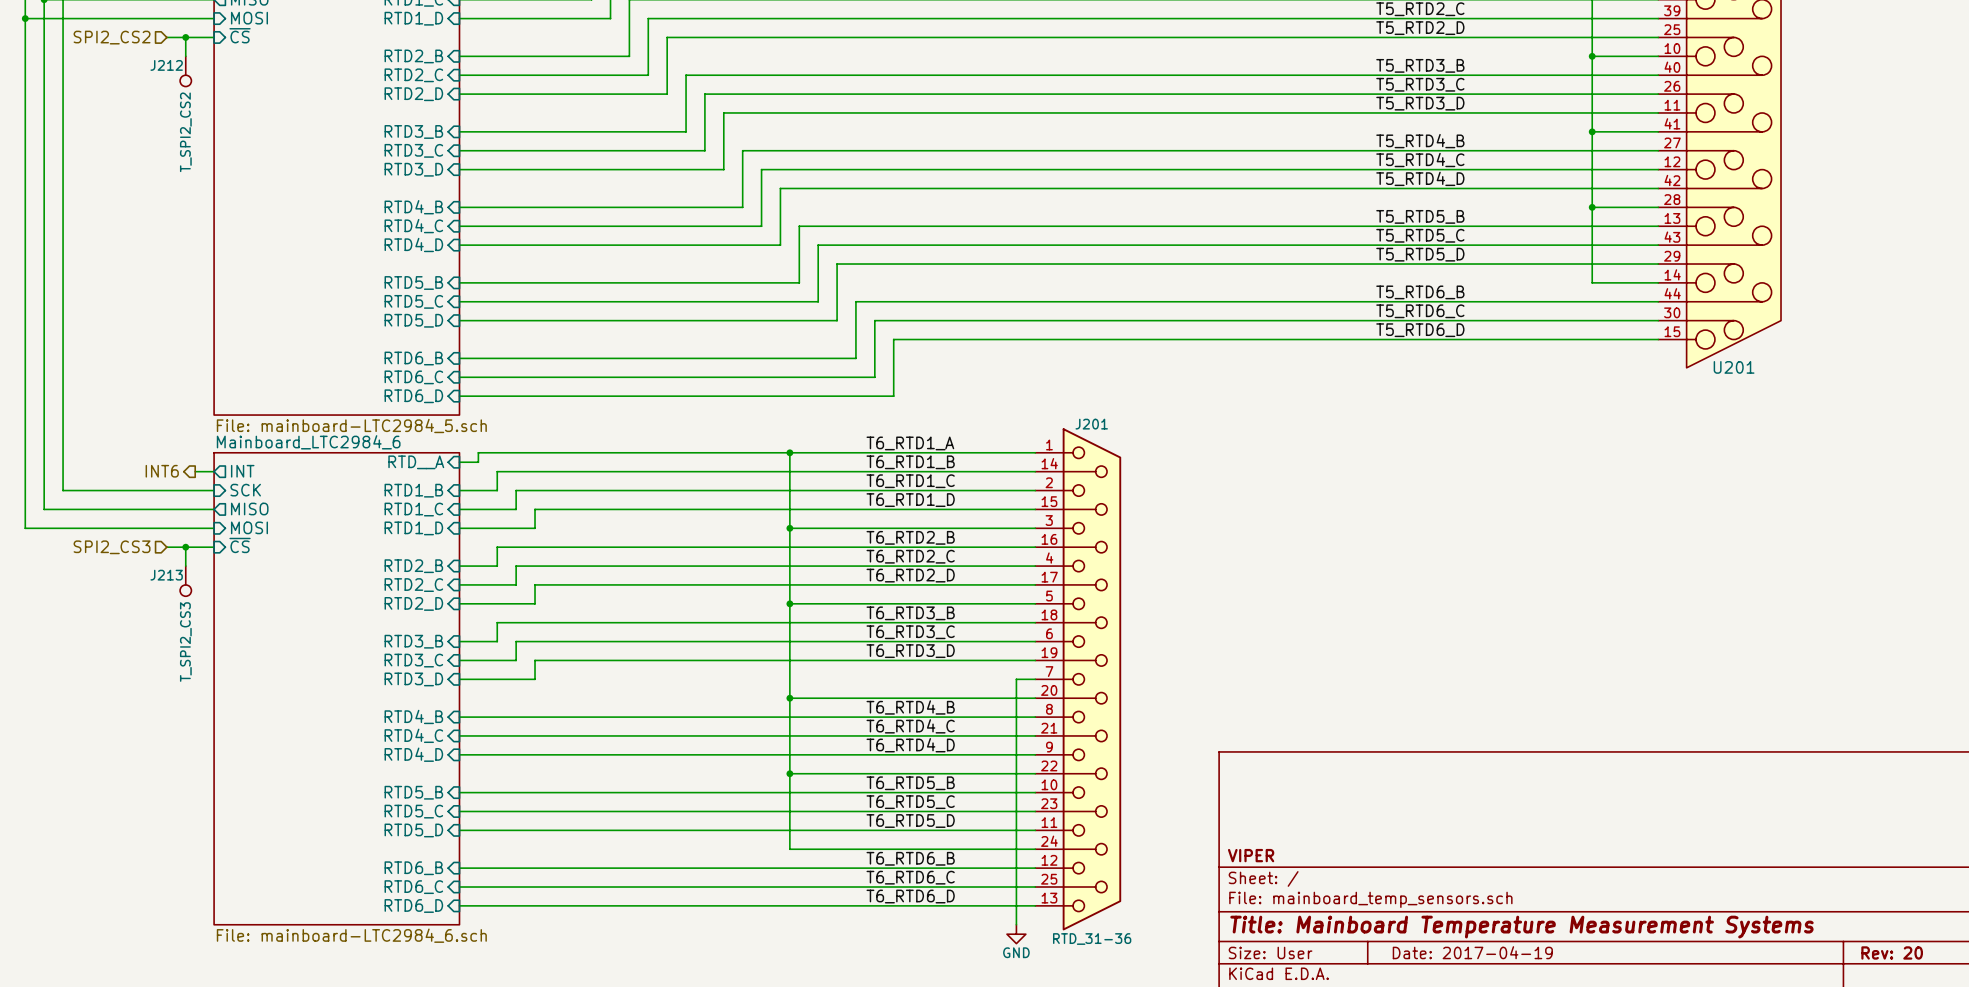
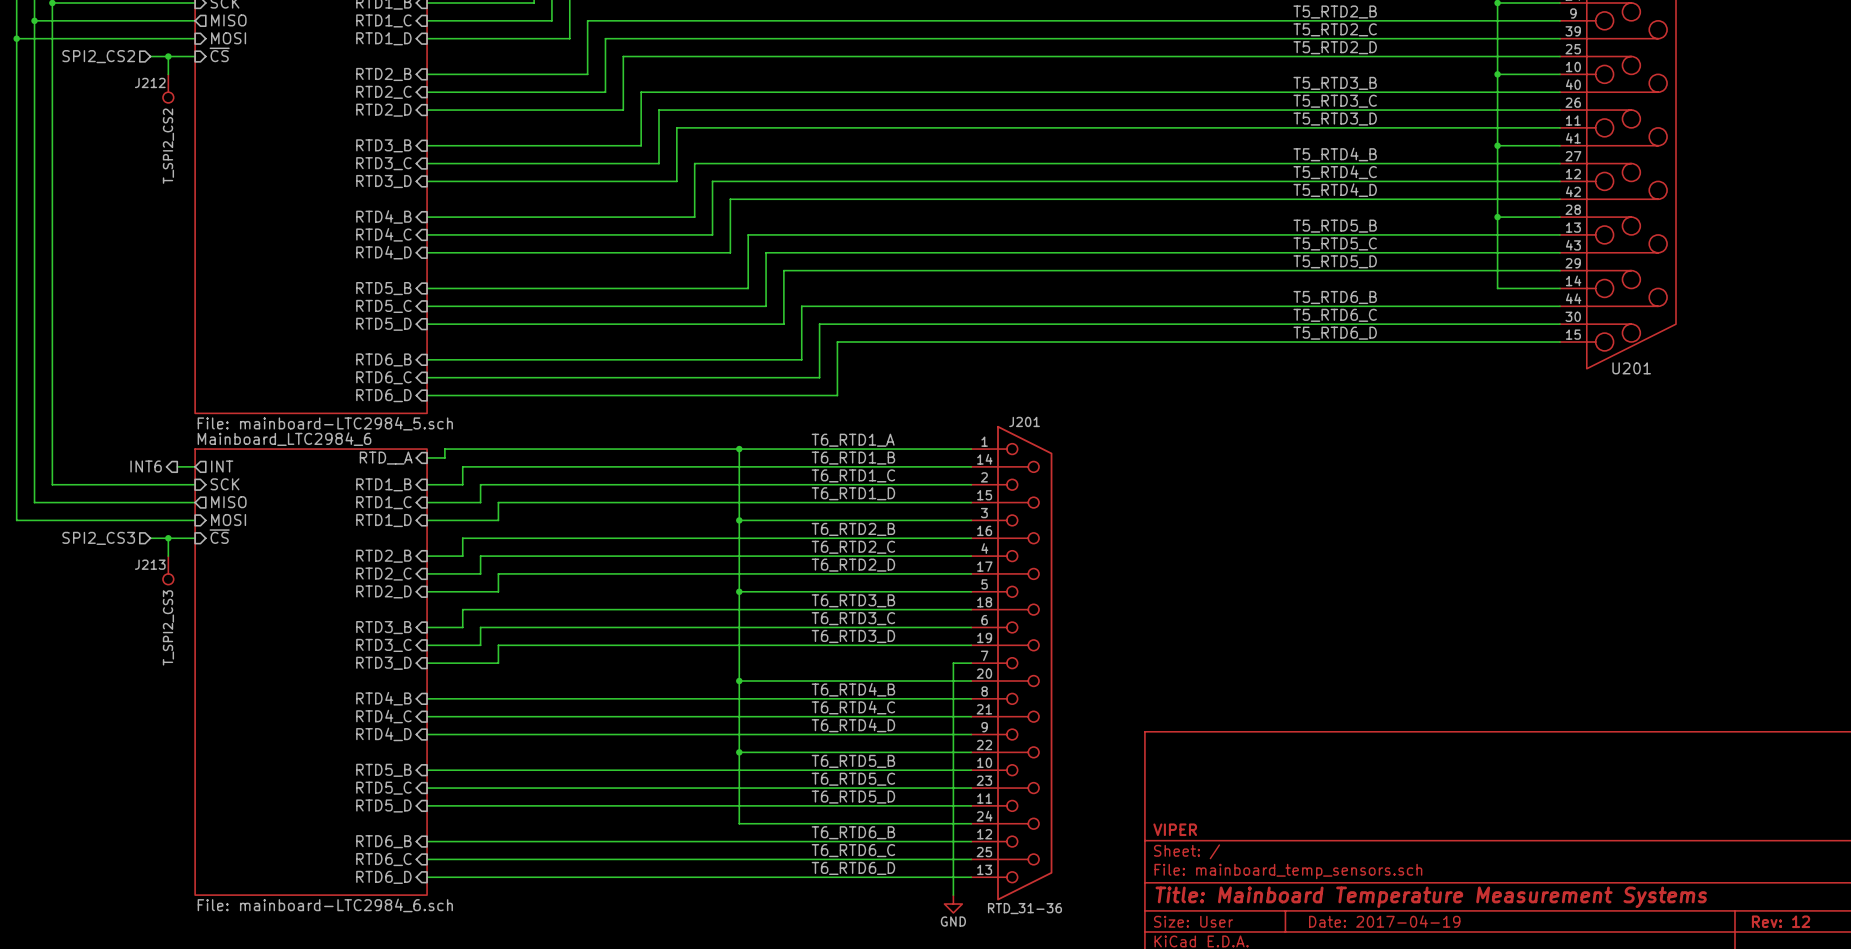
title block: Rev: 20 (1892, 952) -> Rev: 12 (1781, 921)

